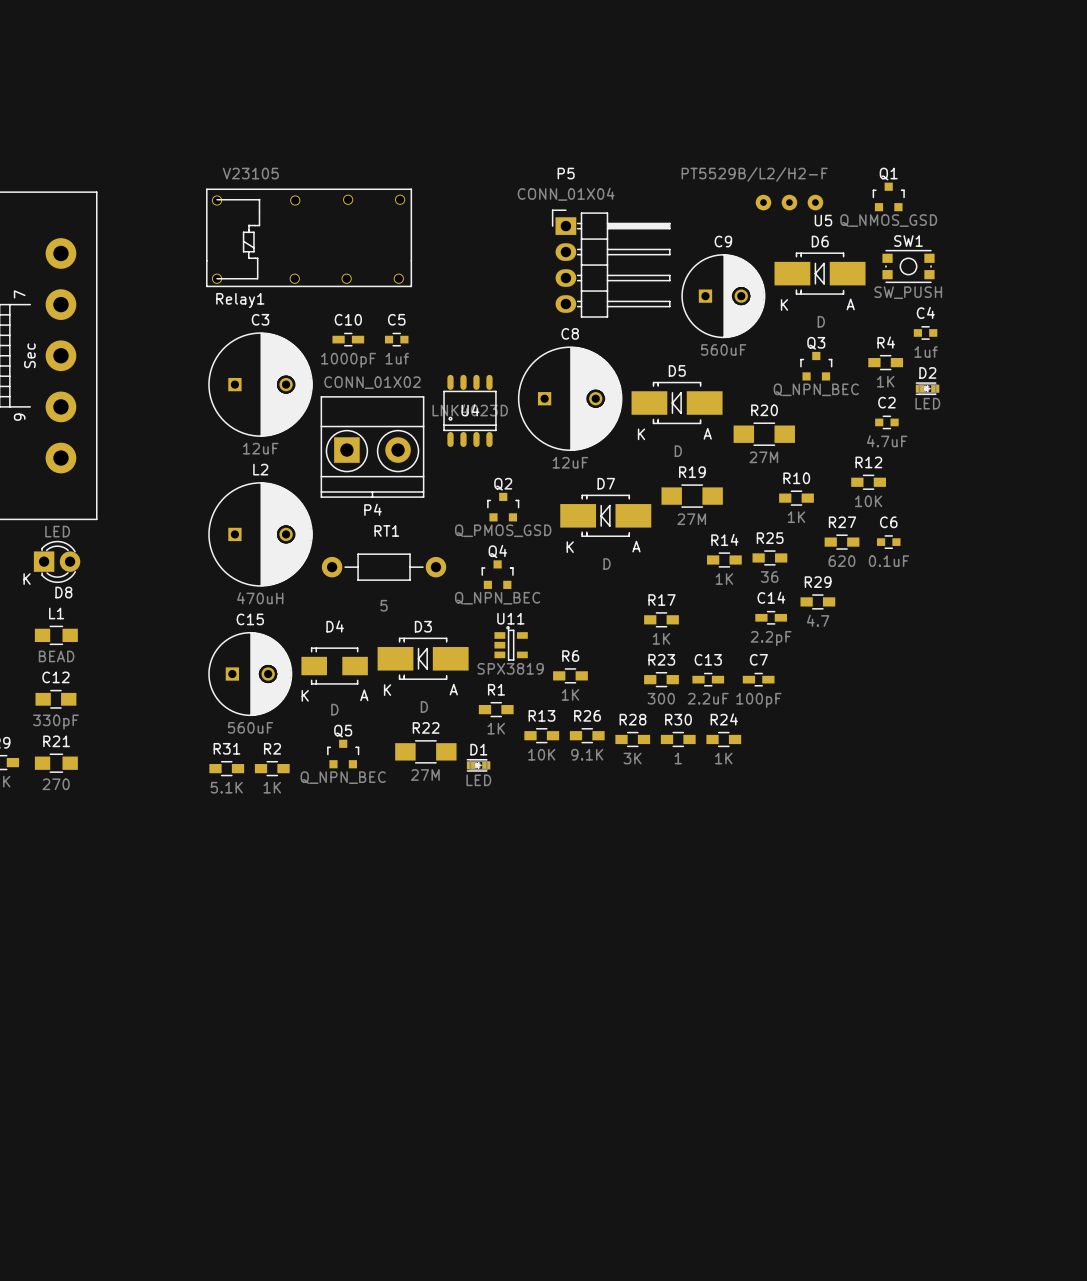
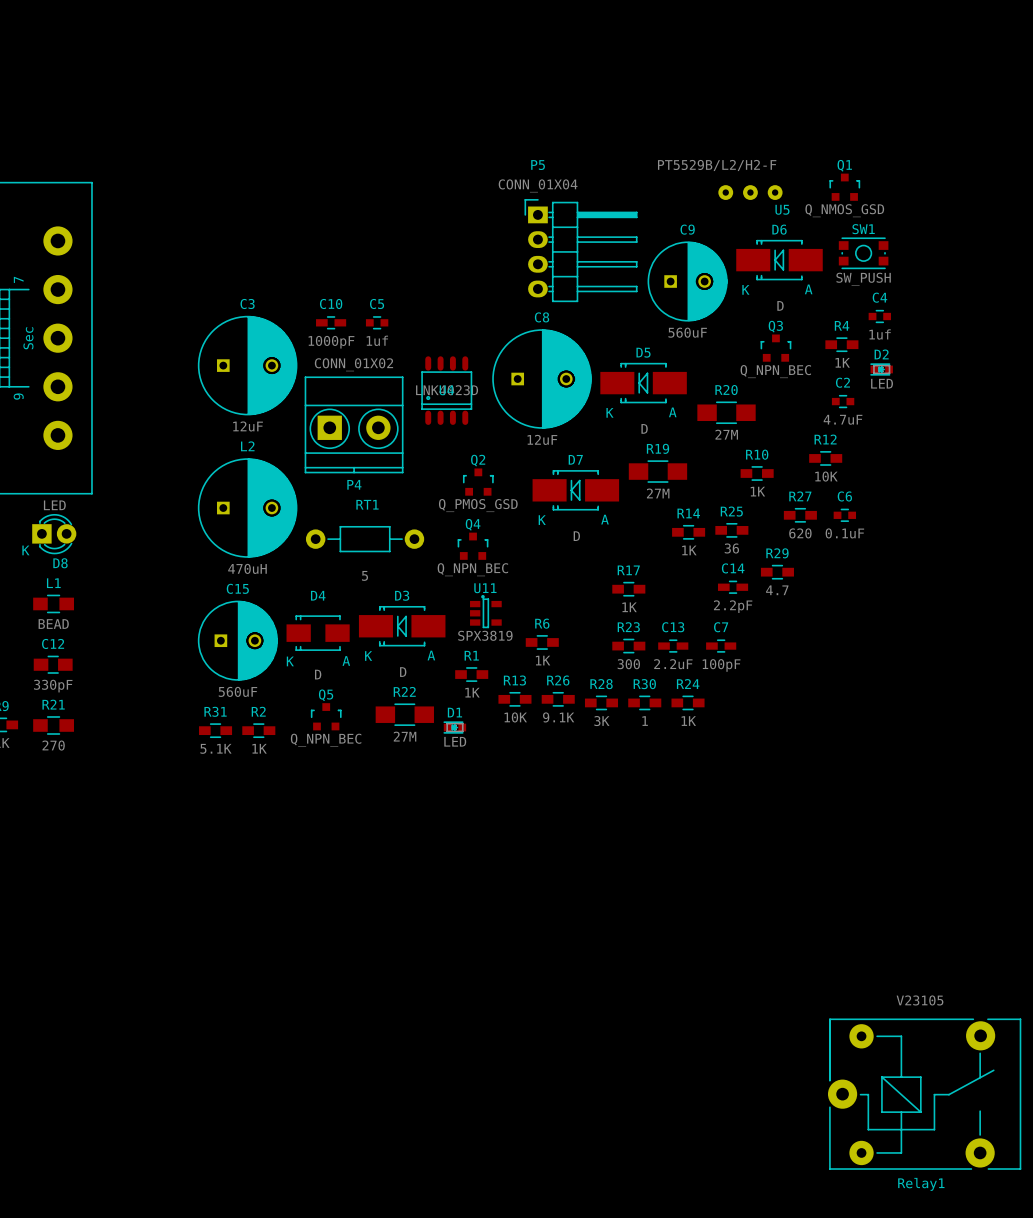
Relay1 value position: V23105 (250, 173) -> V23105 (920, 1000)
Relay1 footprint: [206, 188, 413, 288] -> [827, 1018, 1022, 1170]
Relay1 name position: Relay1 (240, 300) -> Relay1 (921, 1184)

